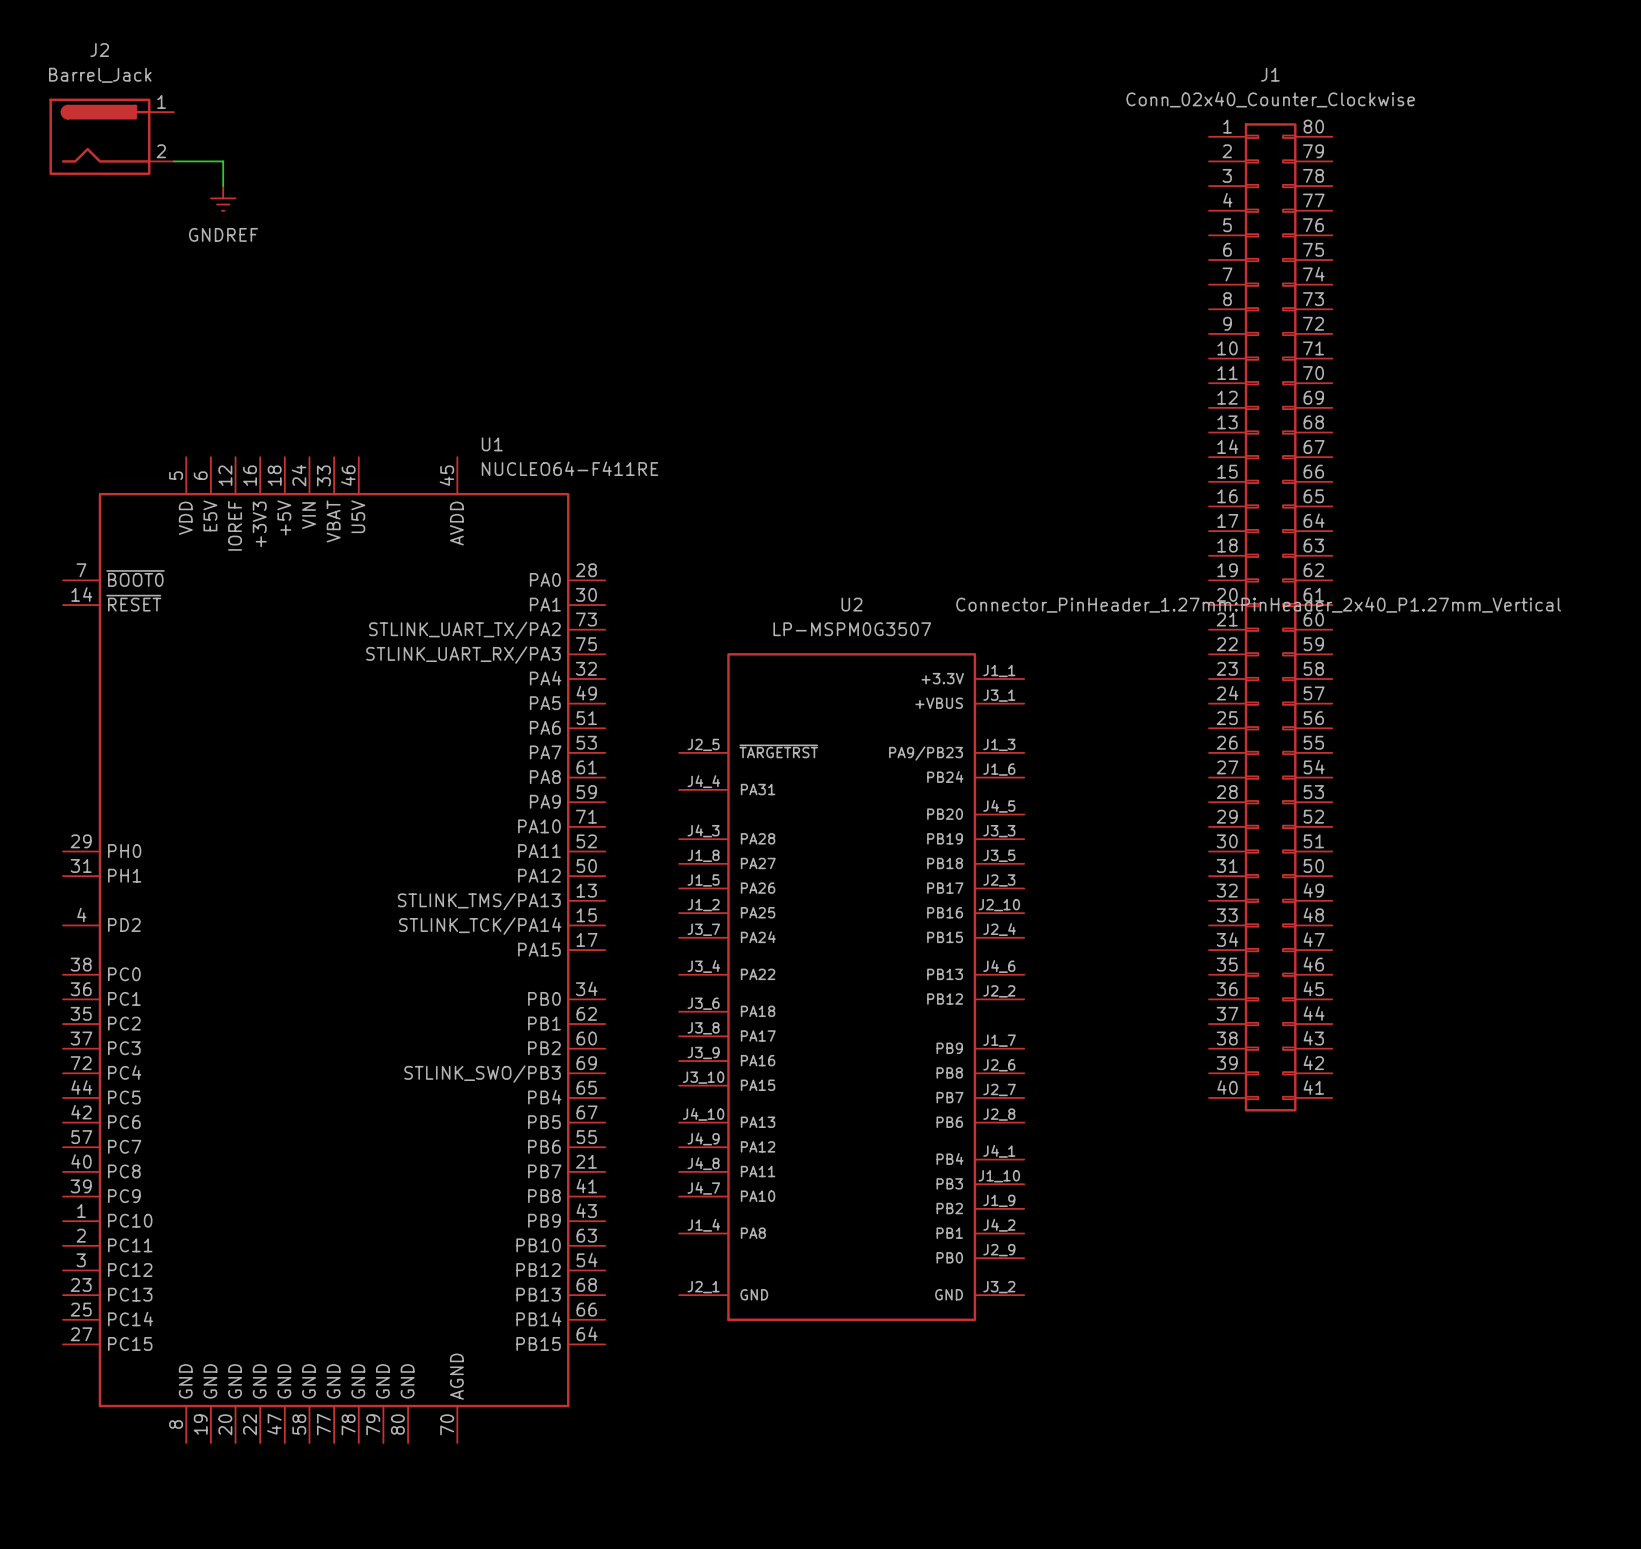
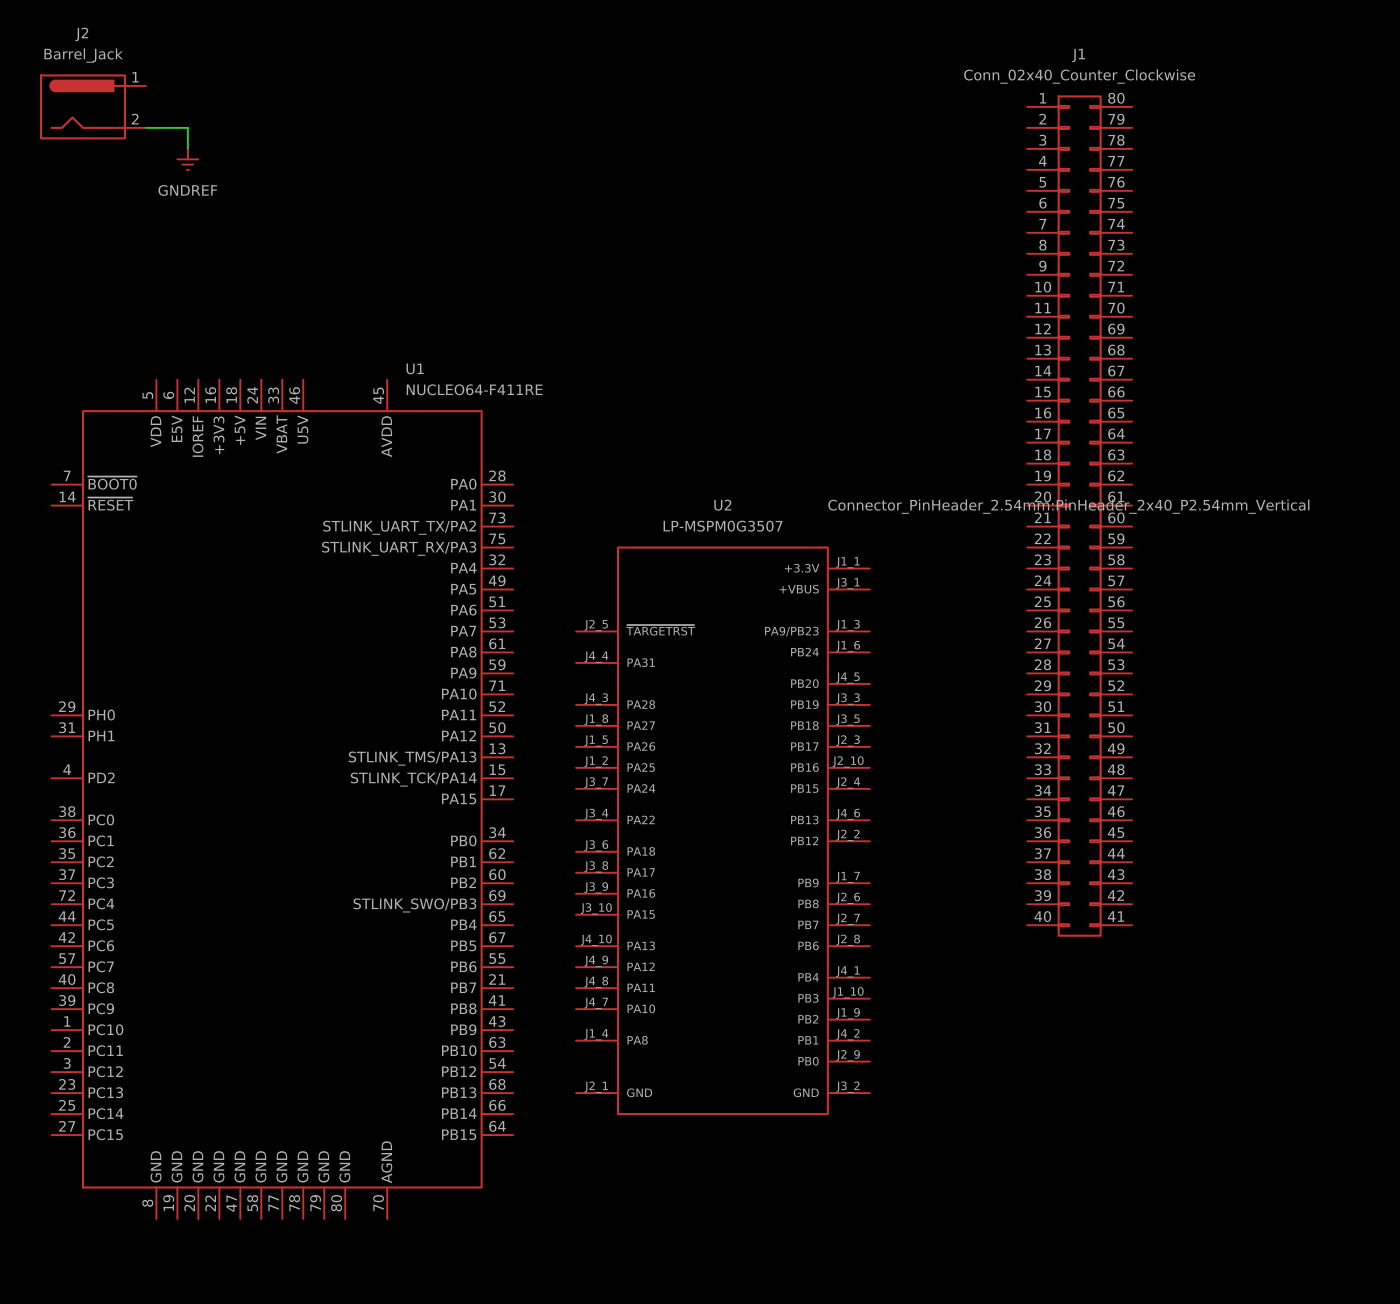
J1 text: Connector_PinHeader_1.27mm:PinHeader_2x40_P1.27mm_Vertical (1258, 604) -> Connector_PinHeader_2.54mm:PinHeader_2x40_P2.54mm_Vertical (1068, 506)

